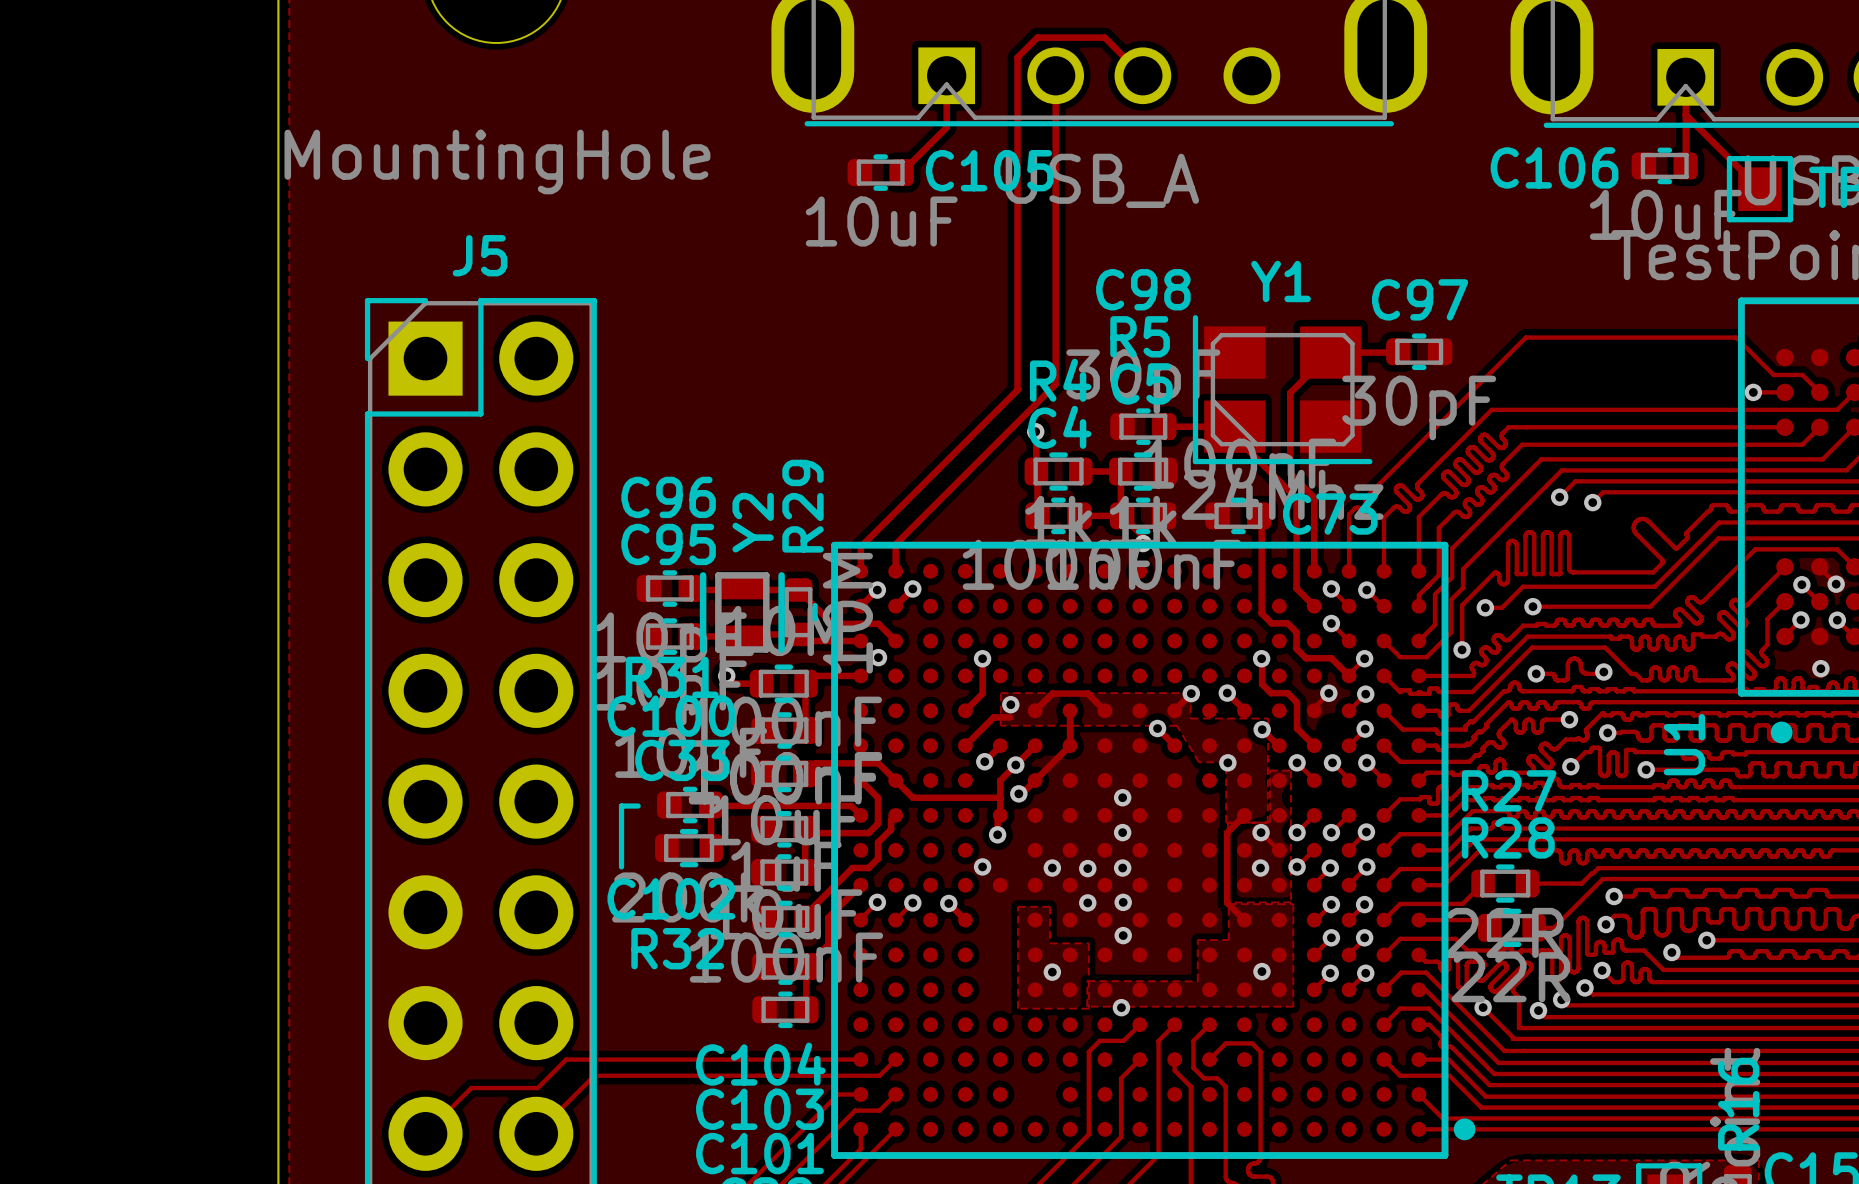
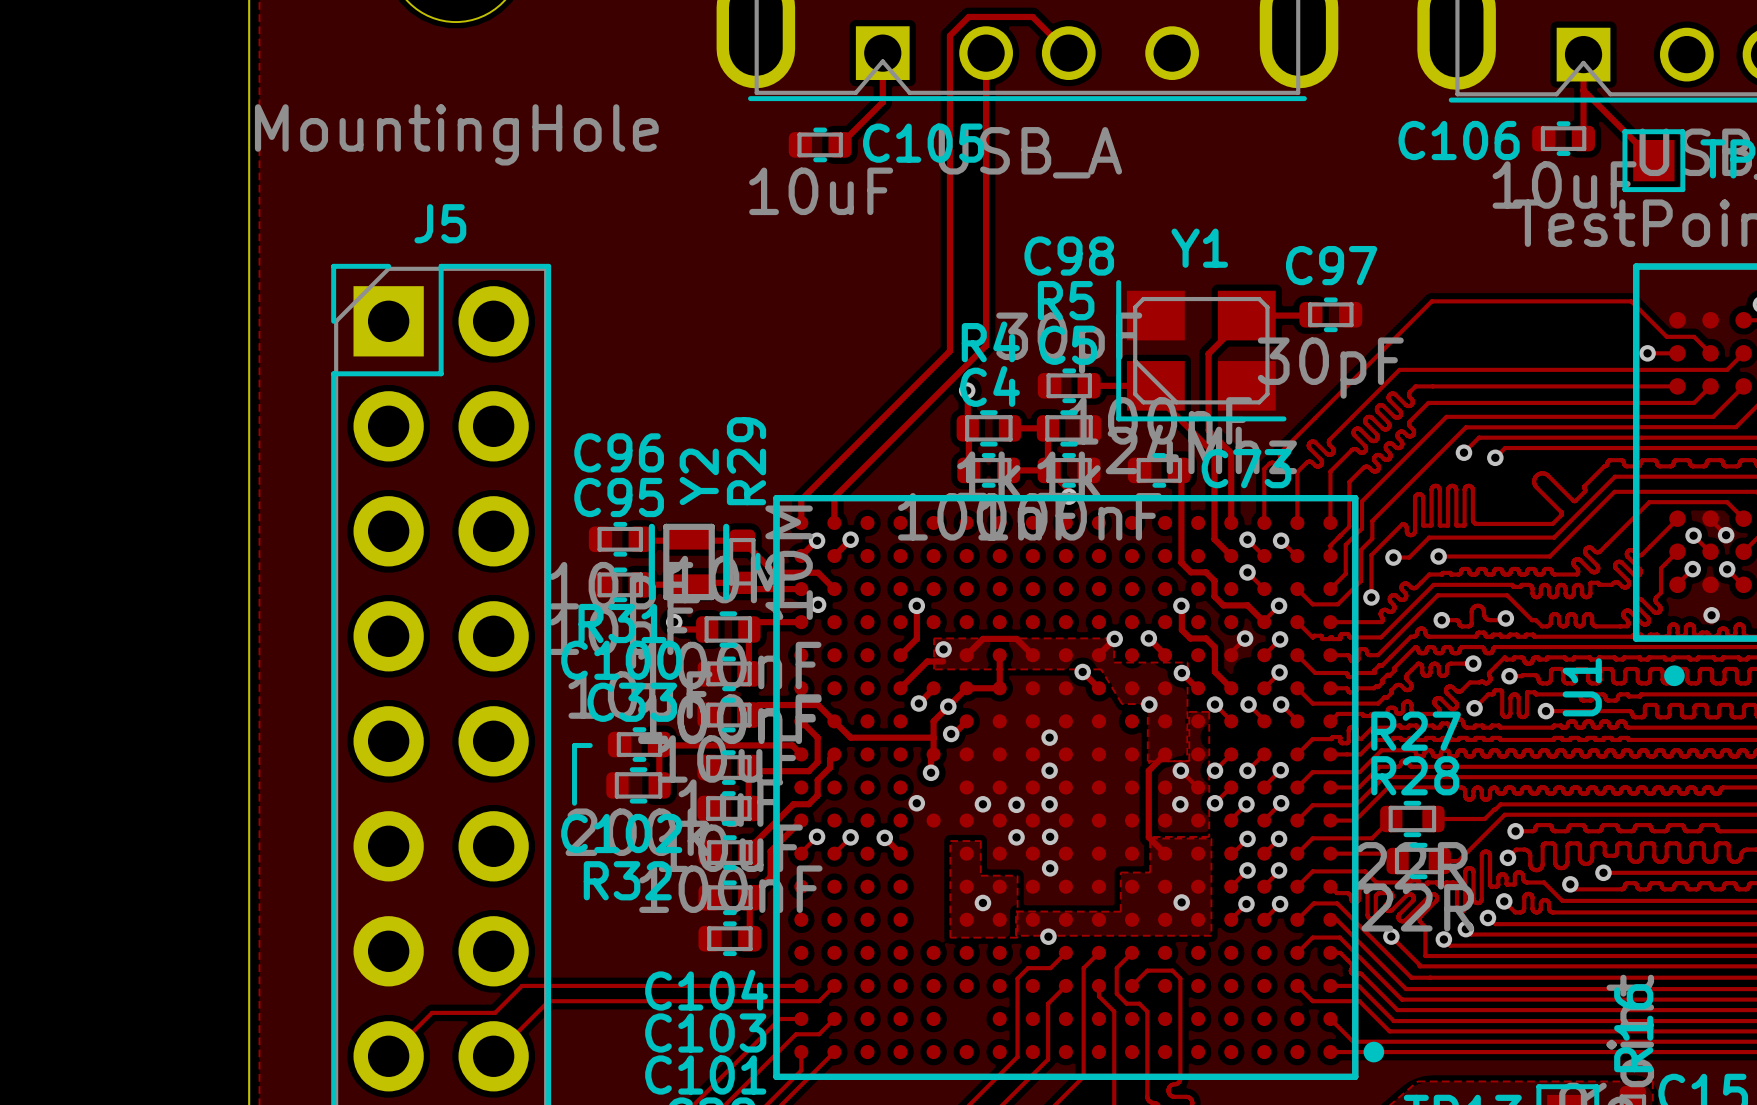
track: (1070, 745) (1035, 780) -> (999, 688) (966, 688)

